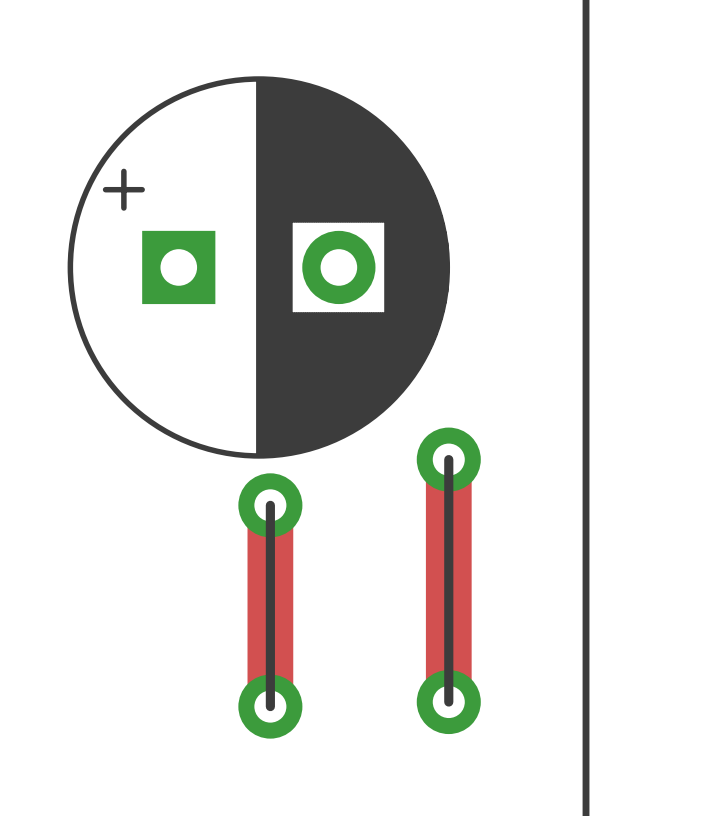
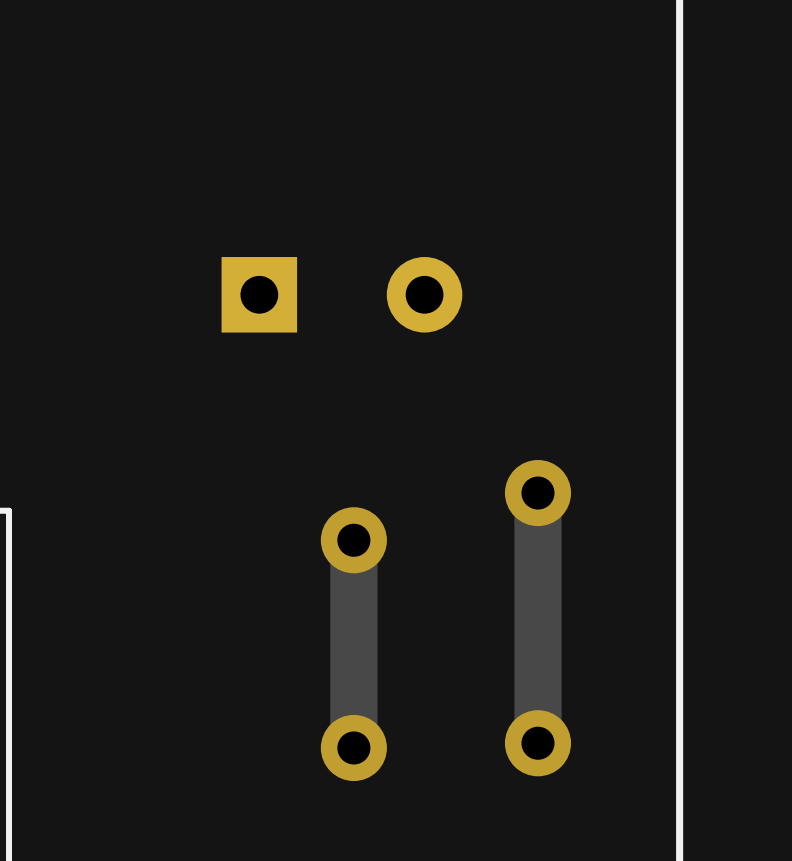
part side: top (258, 267) -> bottom (341, 294)
line: (448, 459) (448, 702) -> none
line: (270, 505) (270, 706) -> none

